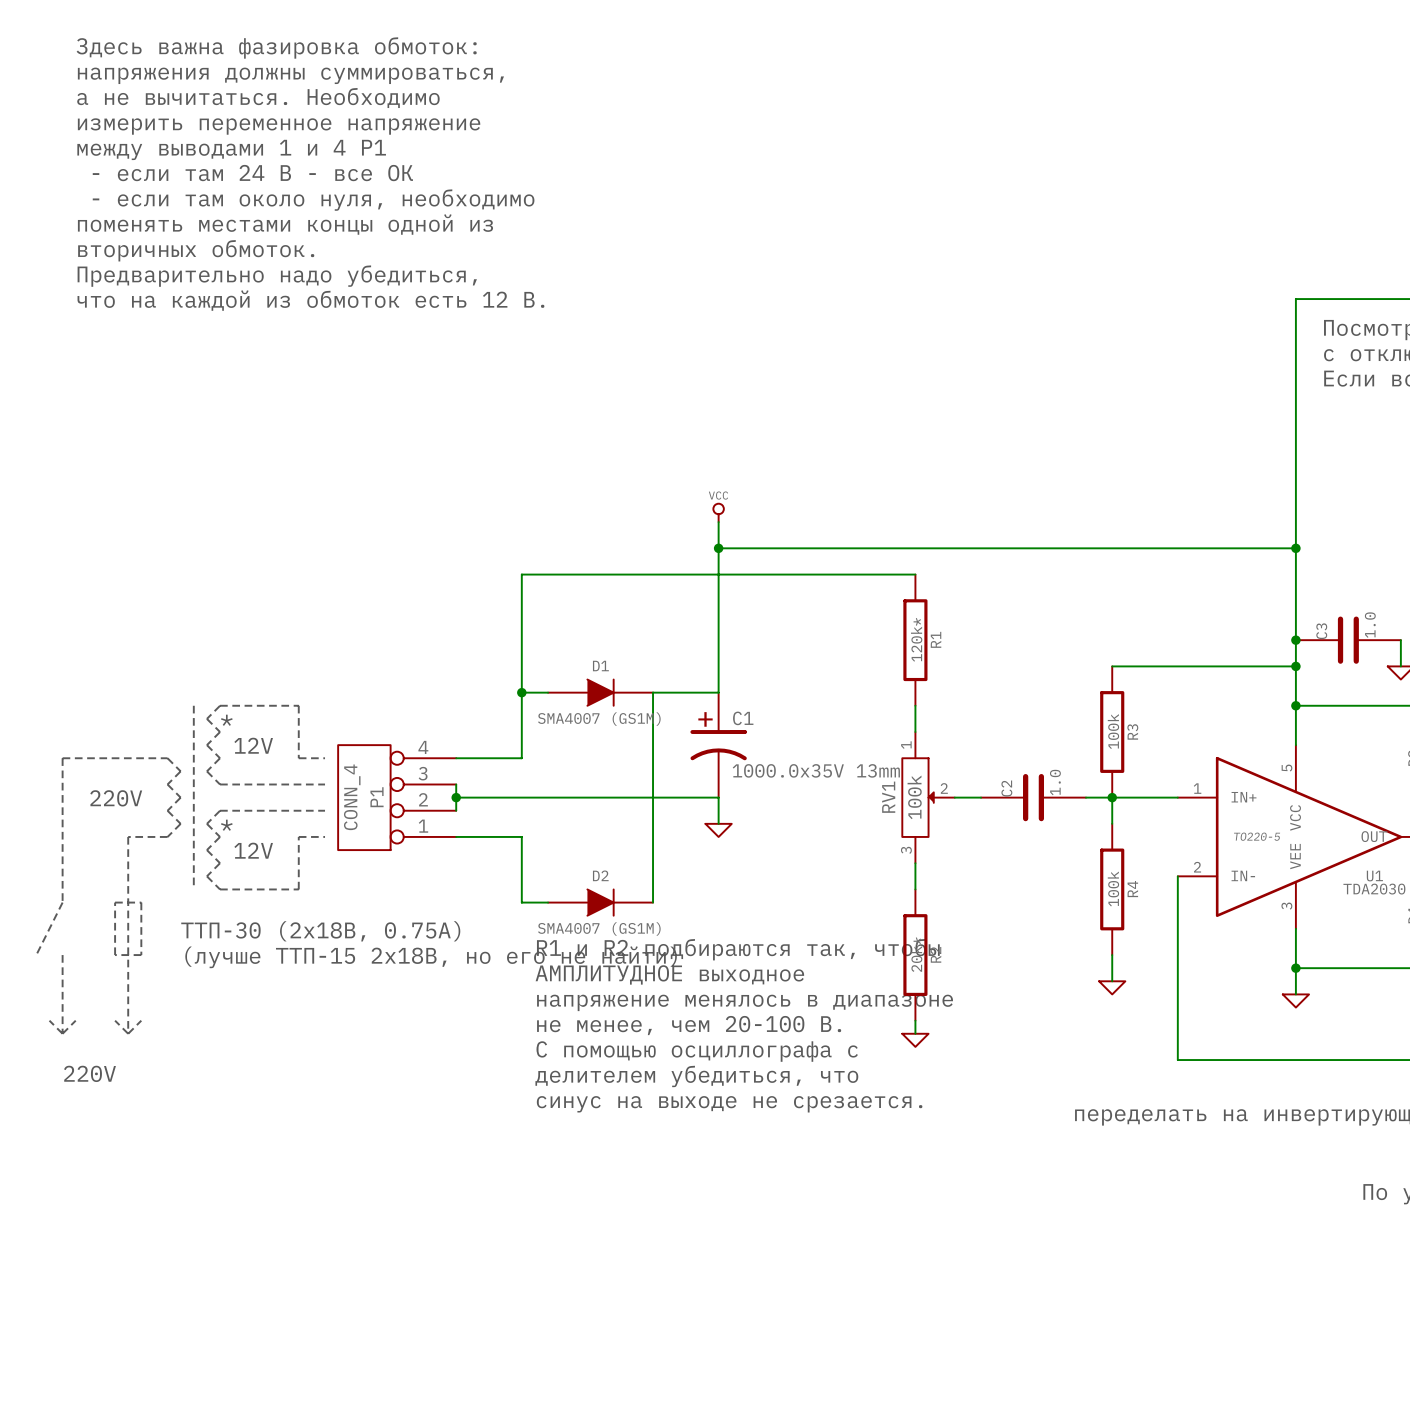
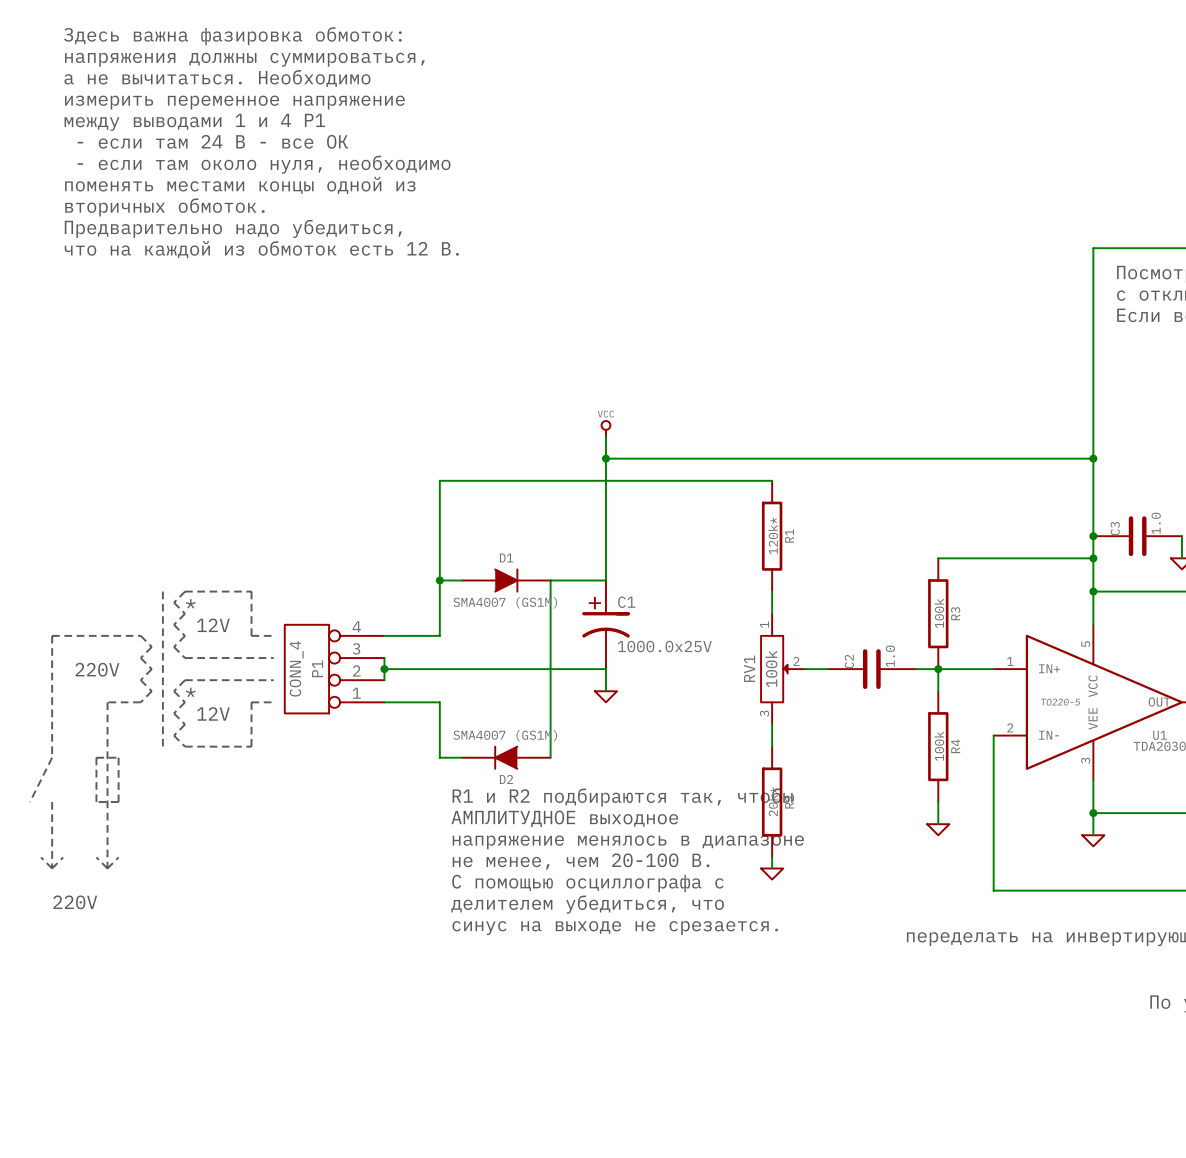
C1 value: 1000.0x35V 13mm (816, 770) -> 1000.0x25V (664, 646)
D2 rotation: 0° (600, 902) -> 180° (505, 757)
text: ТТП-30 (2х18В, 0.75А) (320, 931) -> none
text: (лучше ТТП-15 2х18В, но его не найти) (431, 957) -> none

